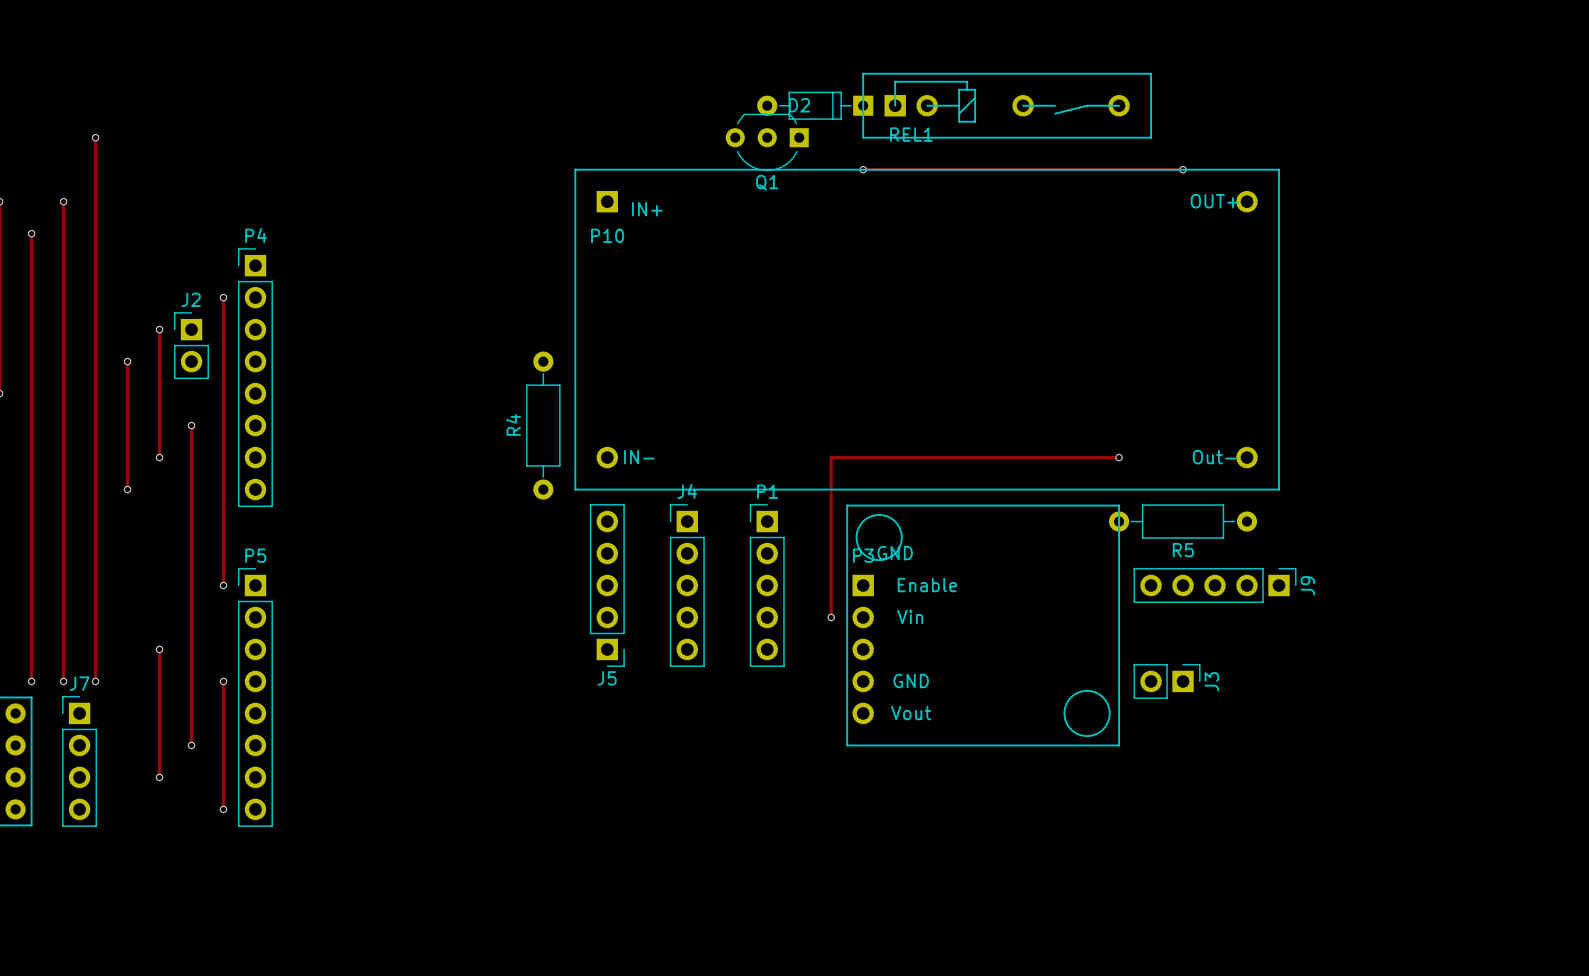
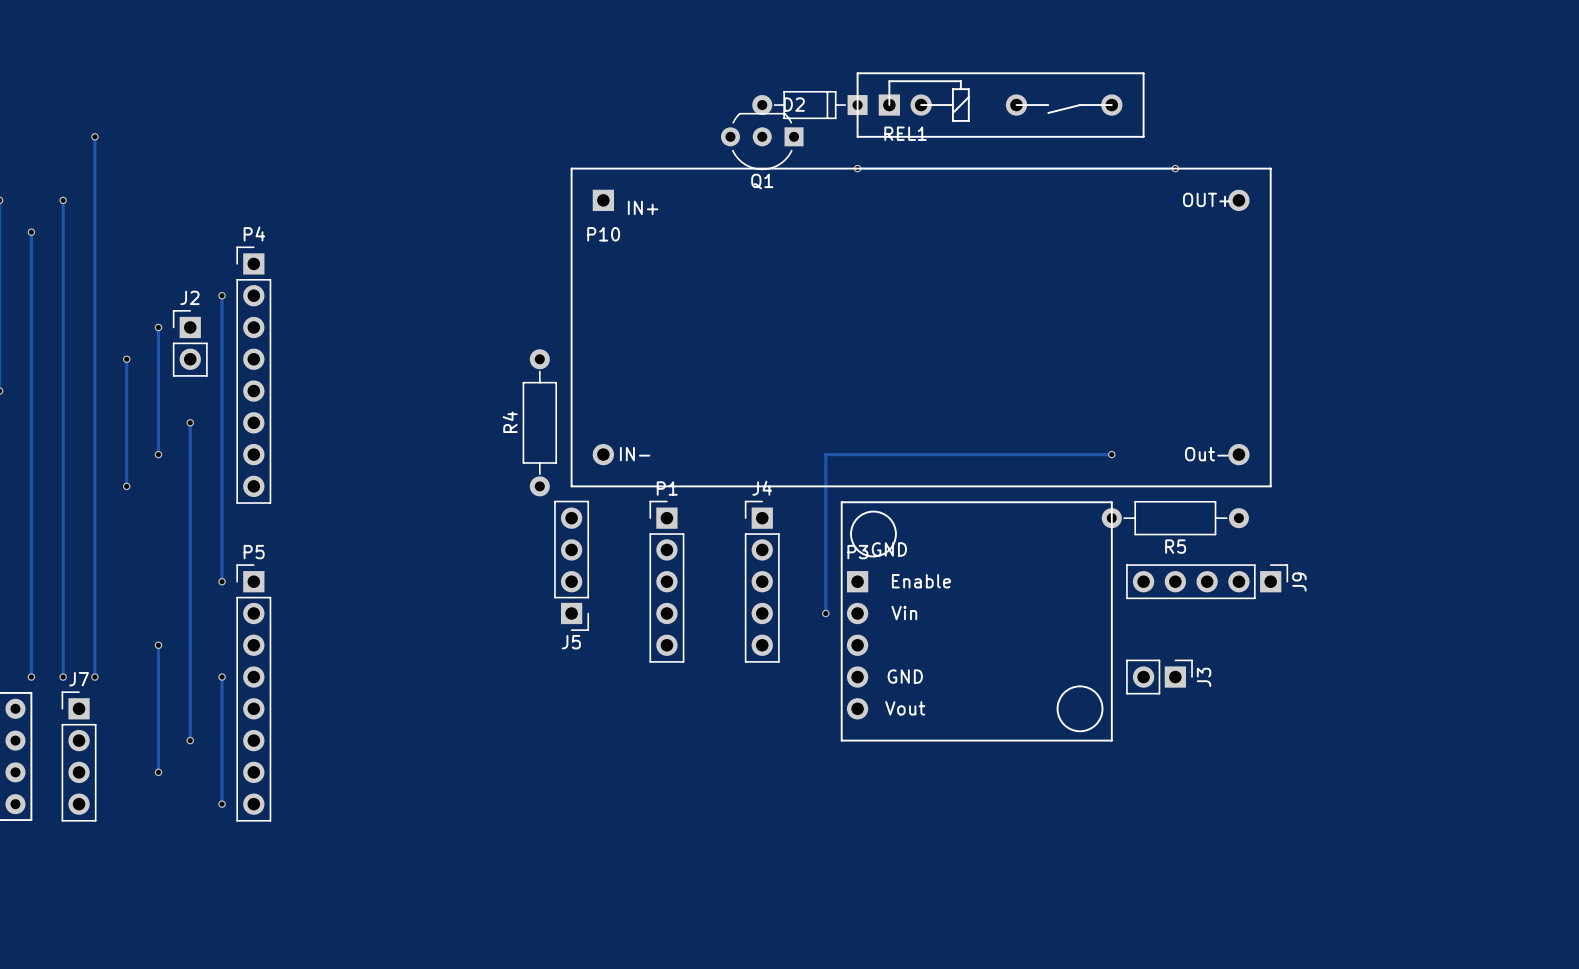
P1 name: P1 (767, 491) -> J4 (762, 488)
J5 footprint: [589, 504, 625, 667] -> [554, 500, 589, 631]
P1: none -> (666, 581)
J4: (687, 585) -> none

